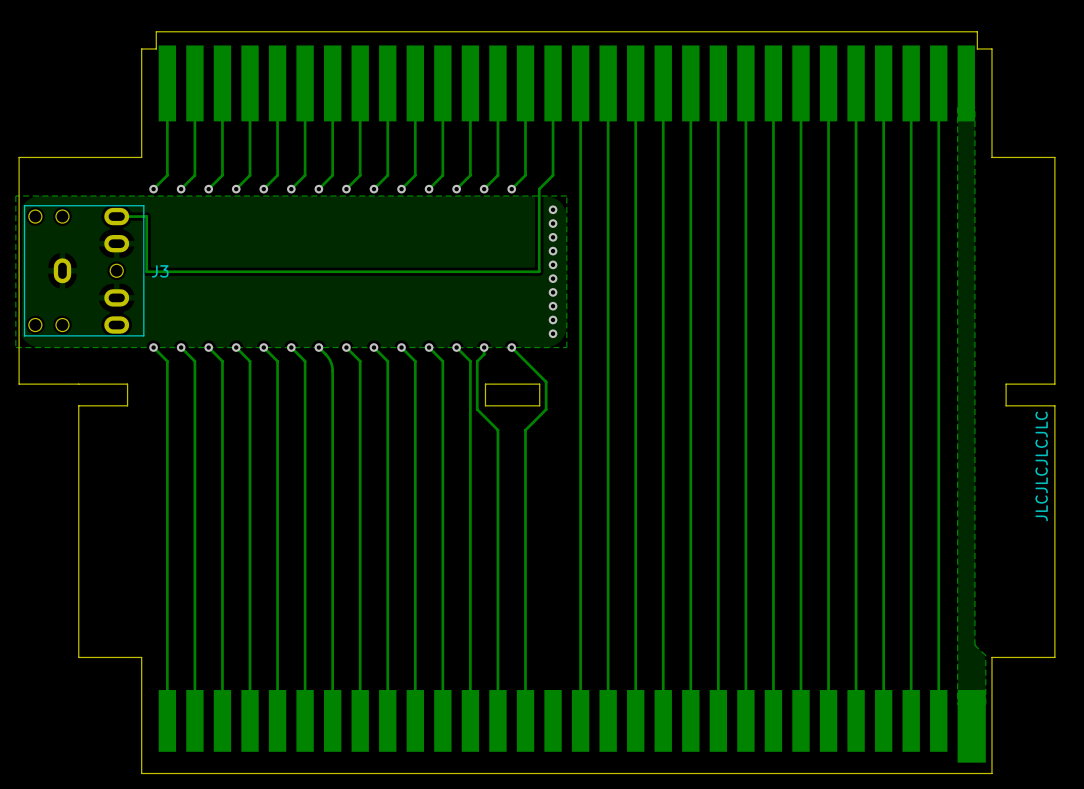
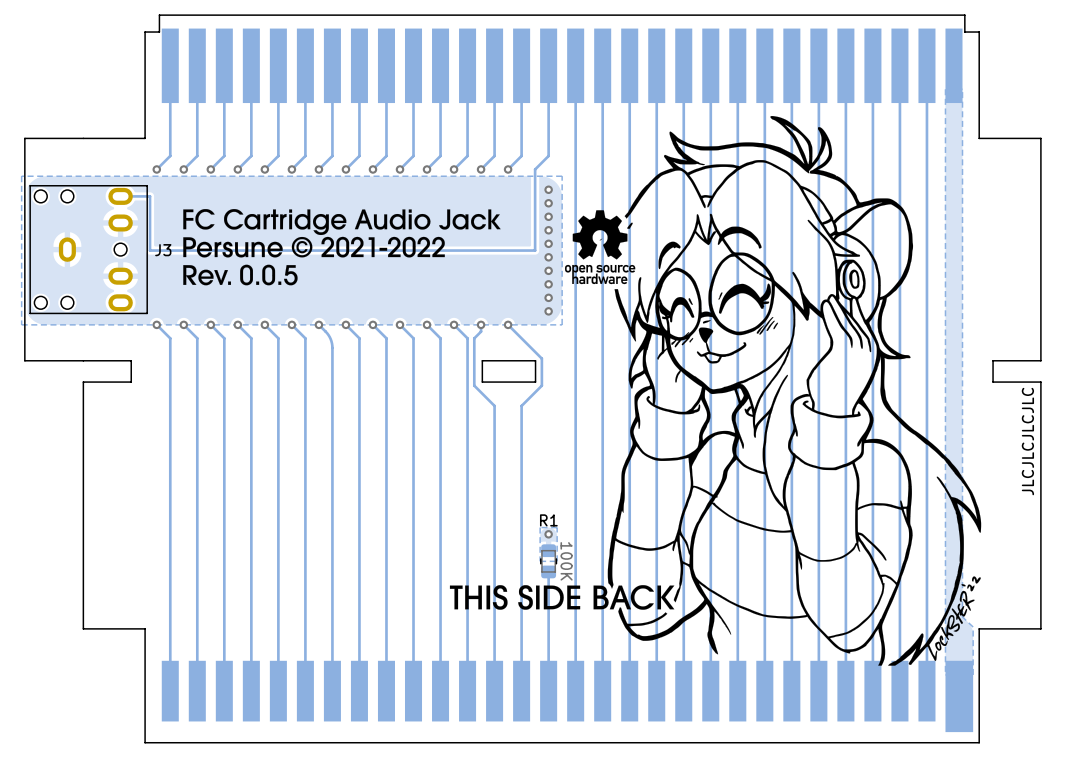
drawing: none -> [183, 116, 982, 666]
zone outline: none -> (557, 527) (557, 561) (540, 561) (540, 527) (557, 527)
via: none -> (548, 534)
R1: none -> 100K (548, 561)
track: none -> (548, 571) (548, 691)

